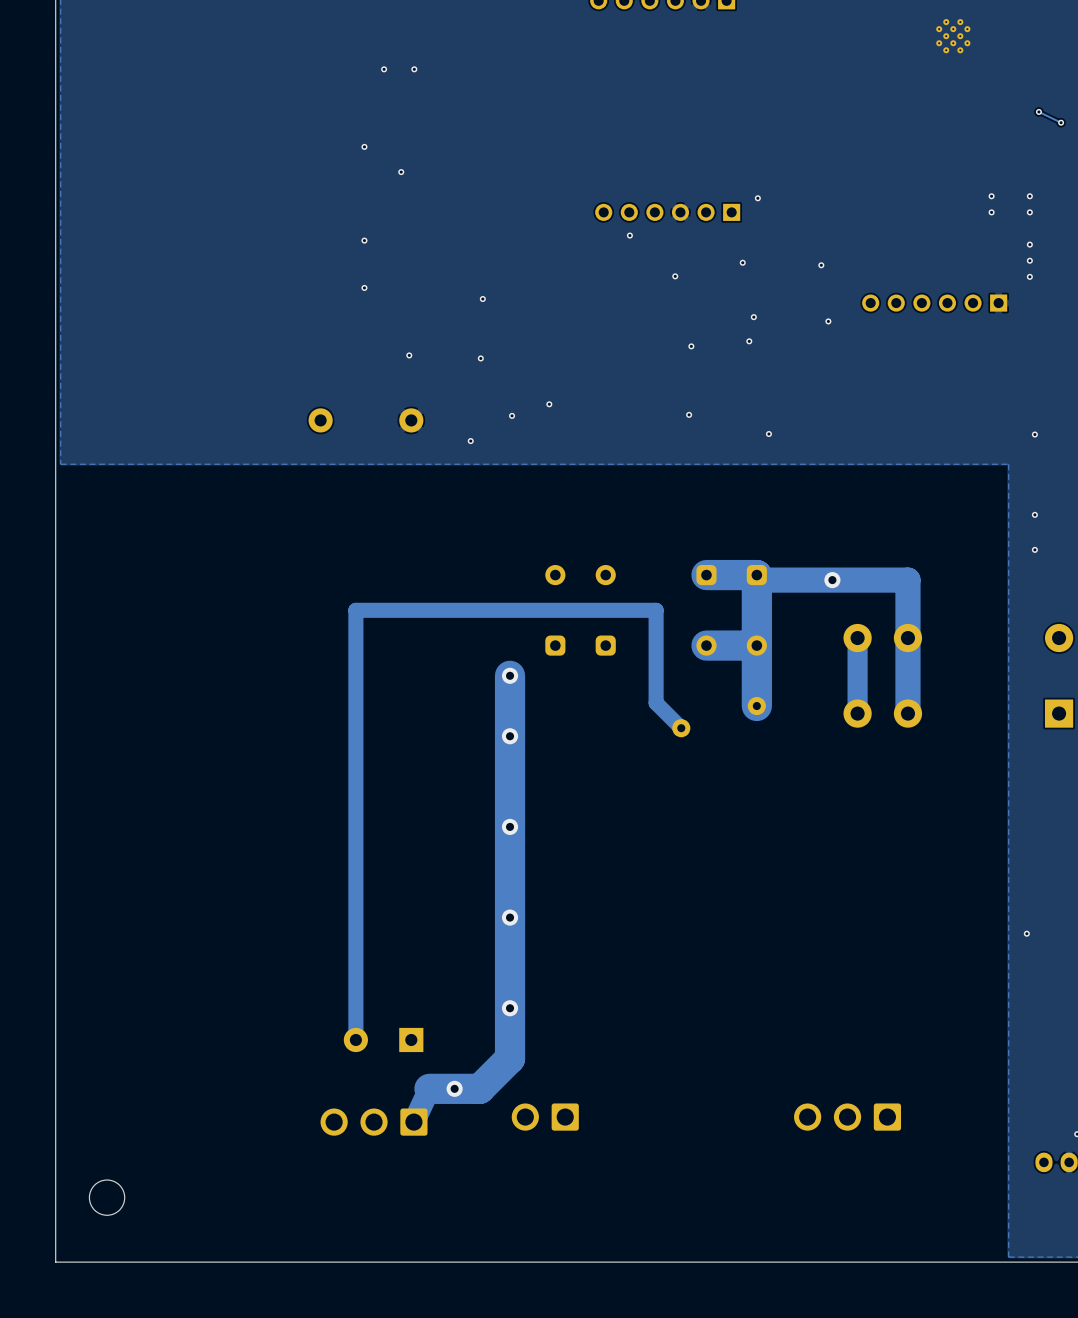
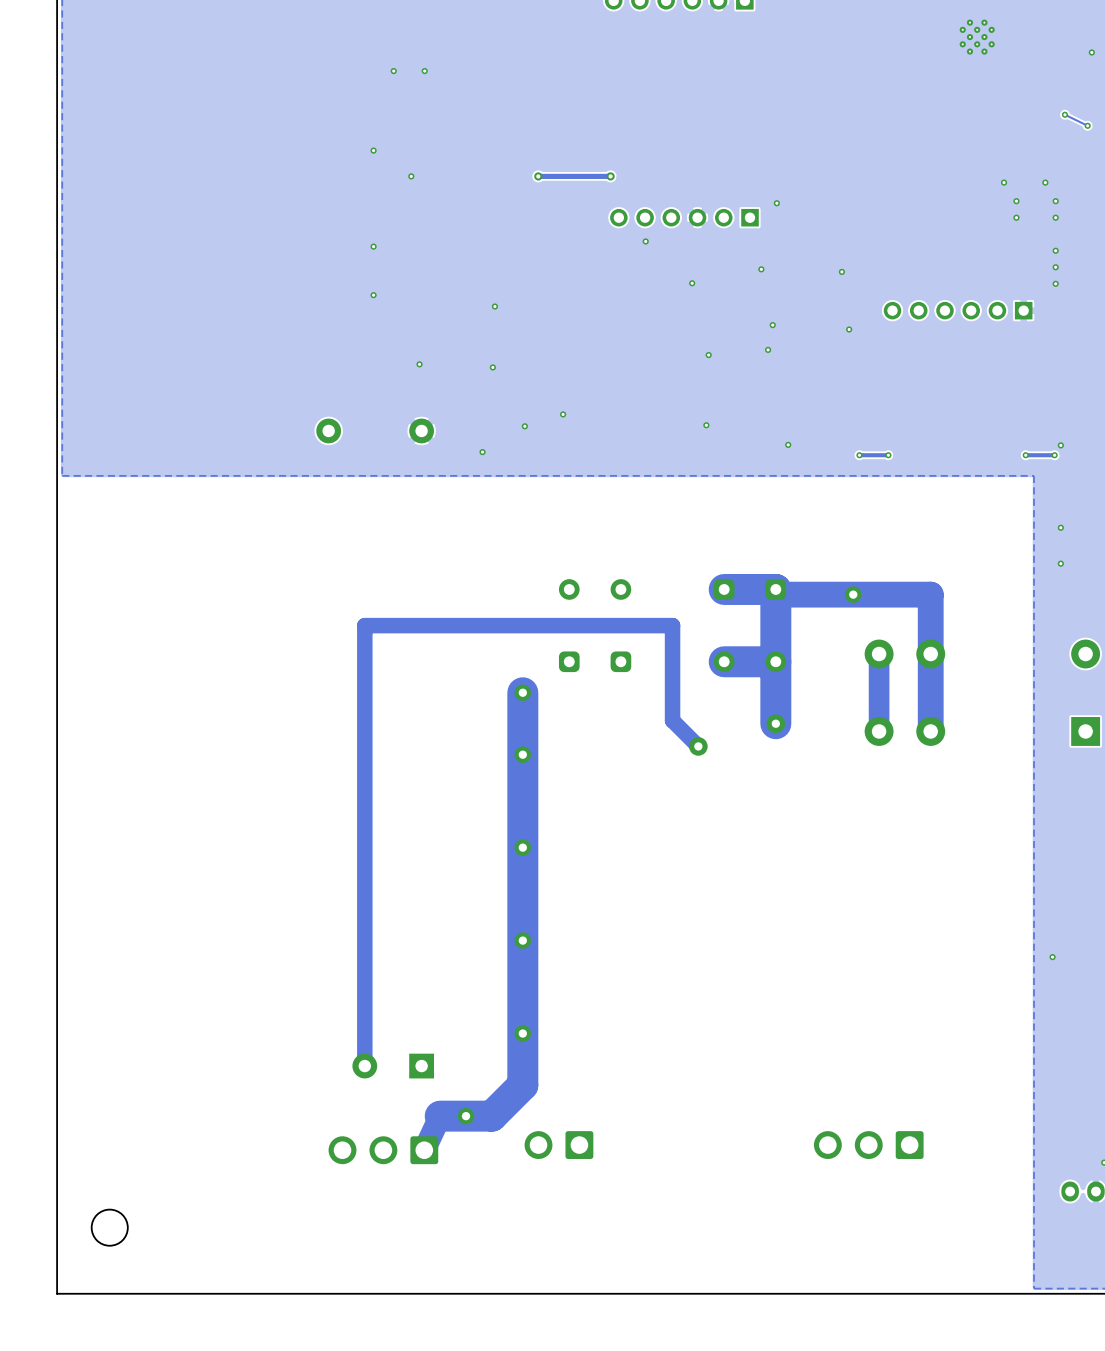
via: none -> (1091, 52)
via: none -> (538, 176)
track: none -> (610, 176) (538, 176)
via: none -> (610, 176)
via: none -> (1004, 182)
via: none -> (1045, 182)
via: none -> (859, 455)
track: none -> (888, 455) (859, 455)
via: none -> (888, 455)
via: none -> (1025, 455)
track: none -> (1054, 455) (1025, 455)
via: none -> (1054, 455)

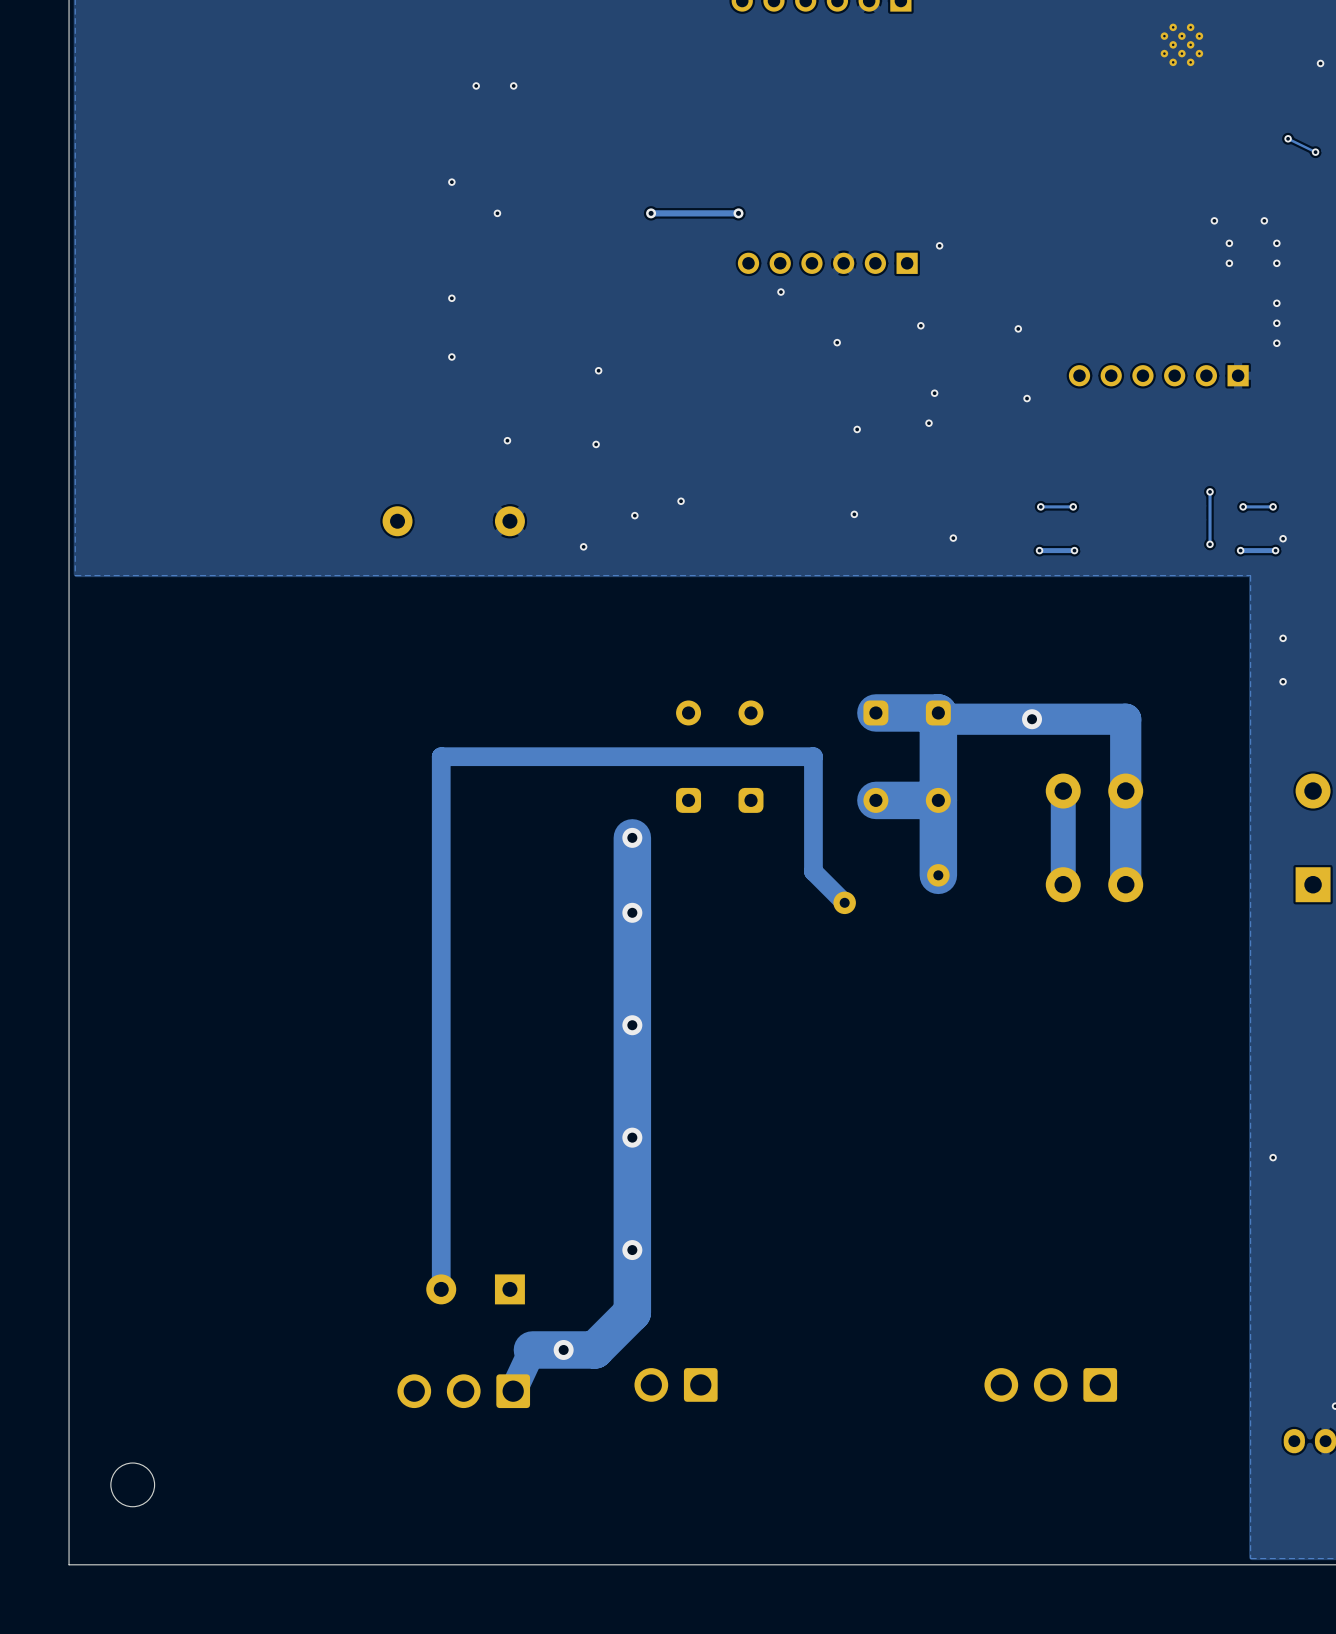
track: none -> (1210, 491) (1210, 544)
via: none -> (1210, 491)
via: none -> (1040, 506)
track: none -> (1073, 506) (1040, 506)
via: none -> (1073, 506)
via: none -> (1243, 506)
track: none -> (1273, 506) (1243, 506)
via: none -> (1273, 506)
via: none -> (1210, 544)

